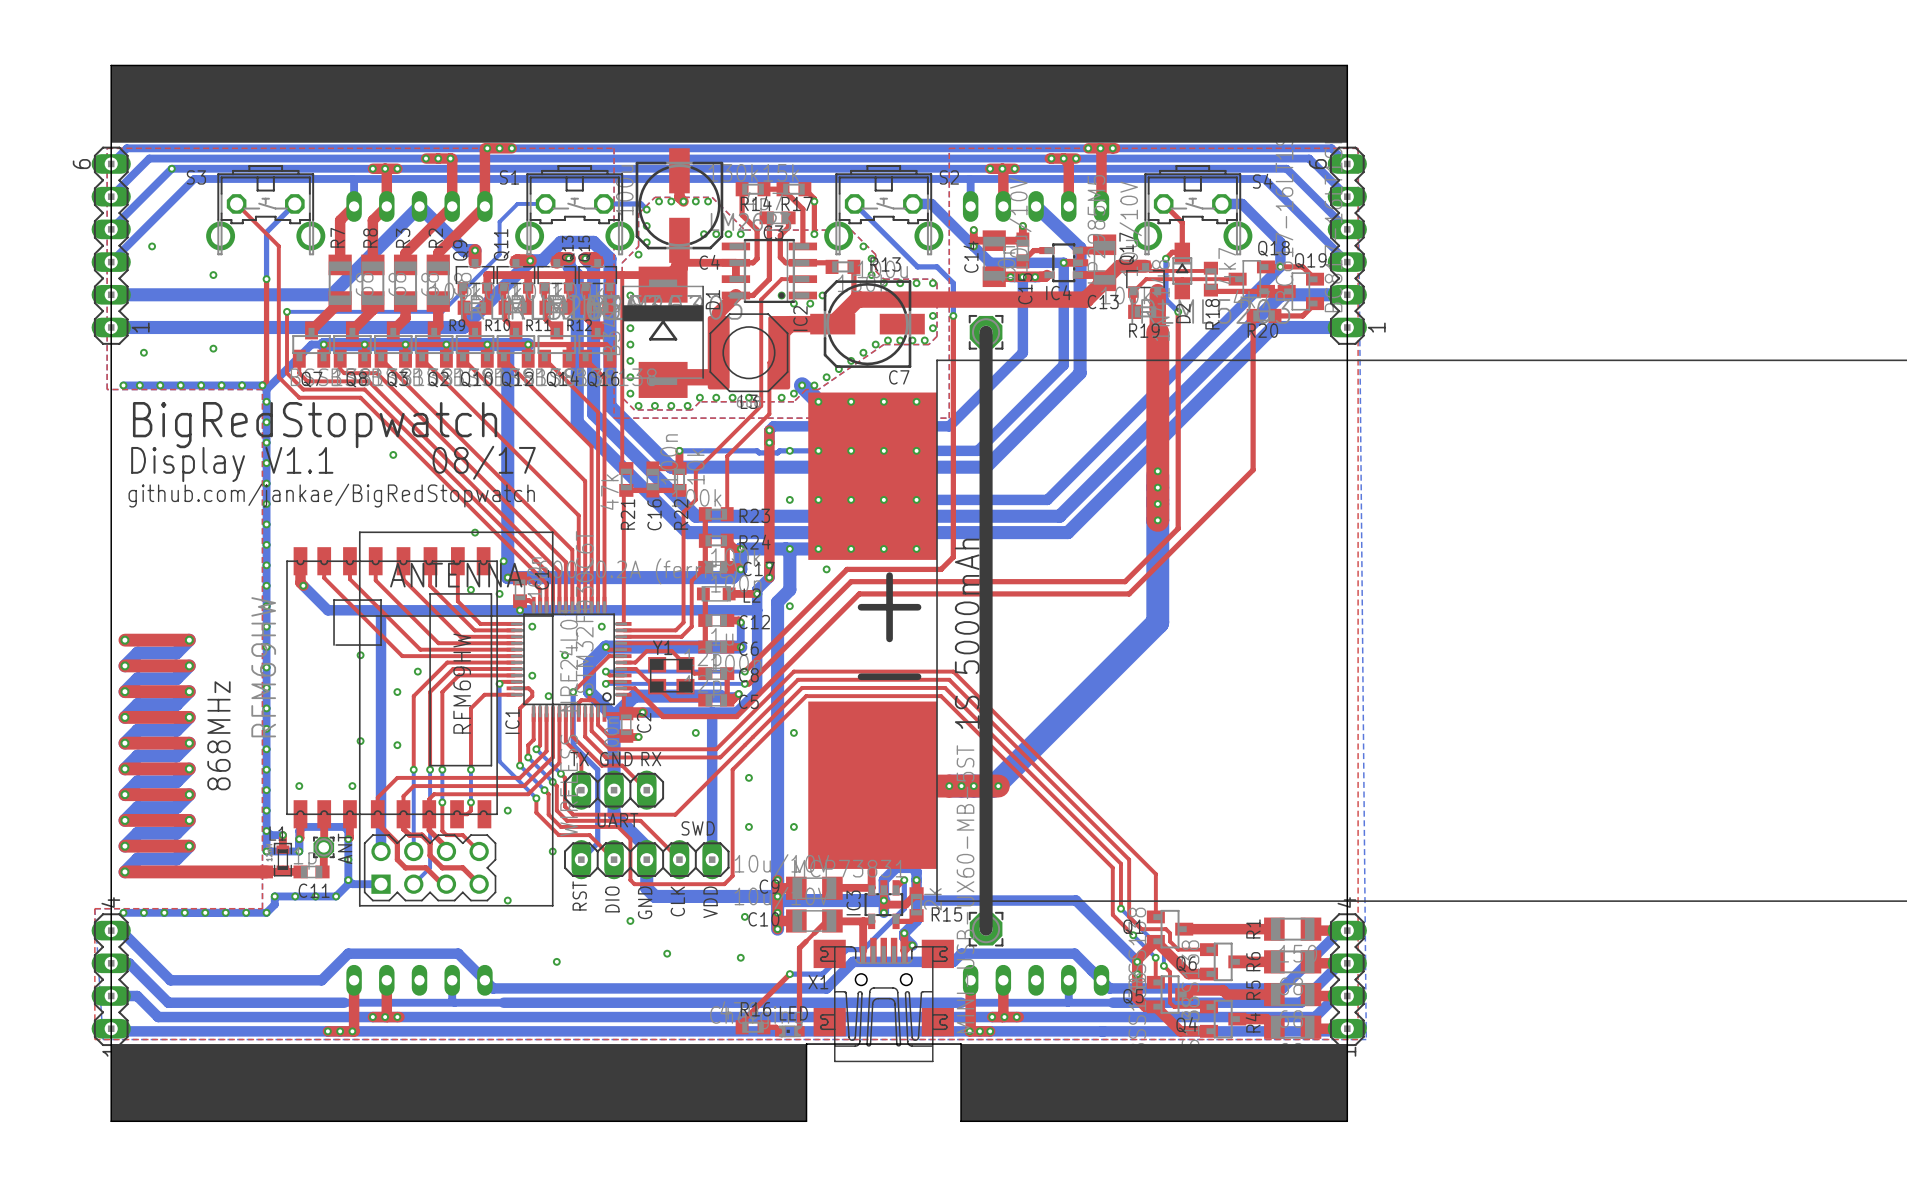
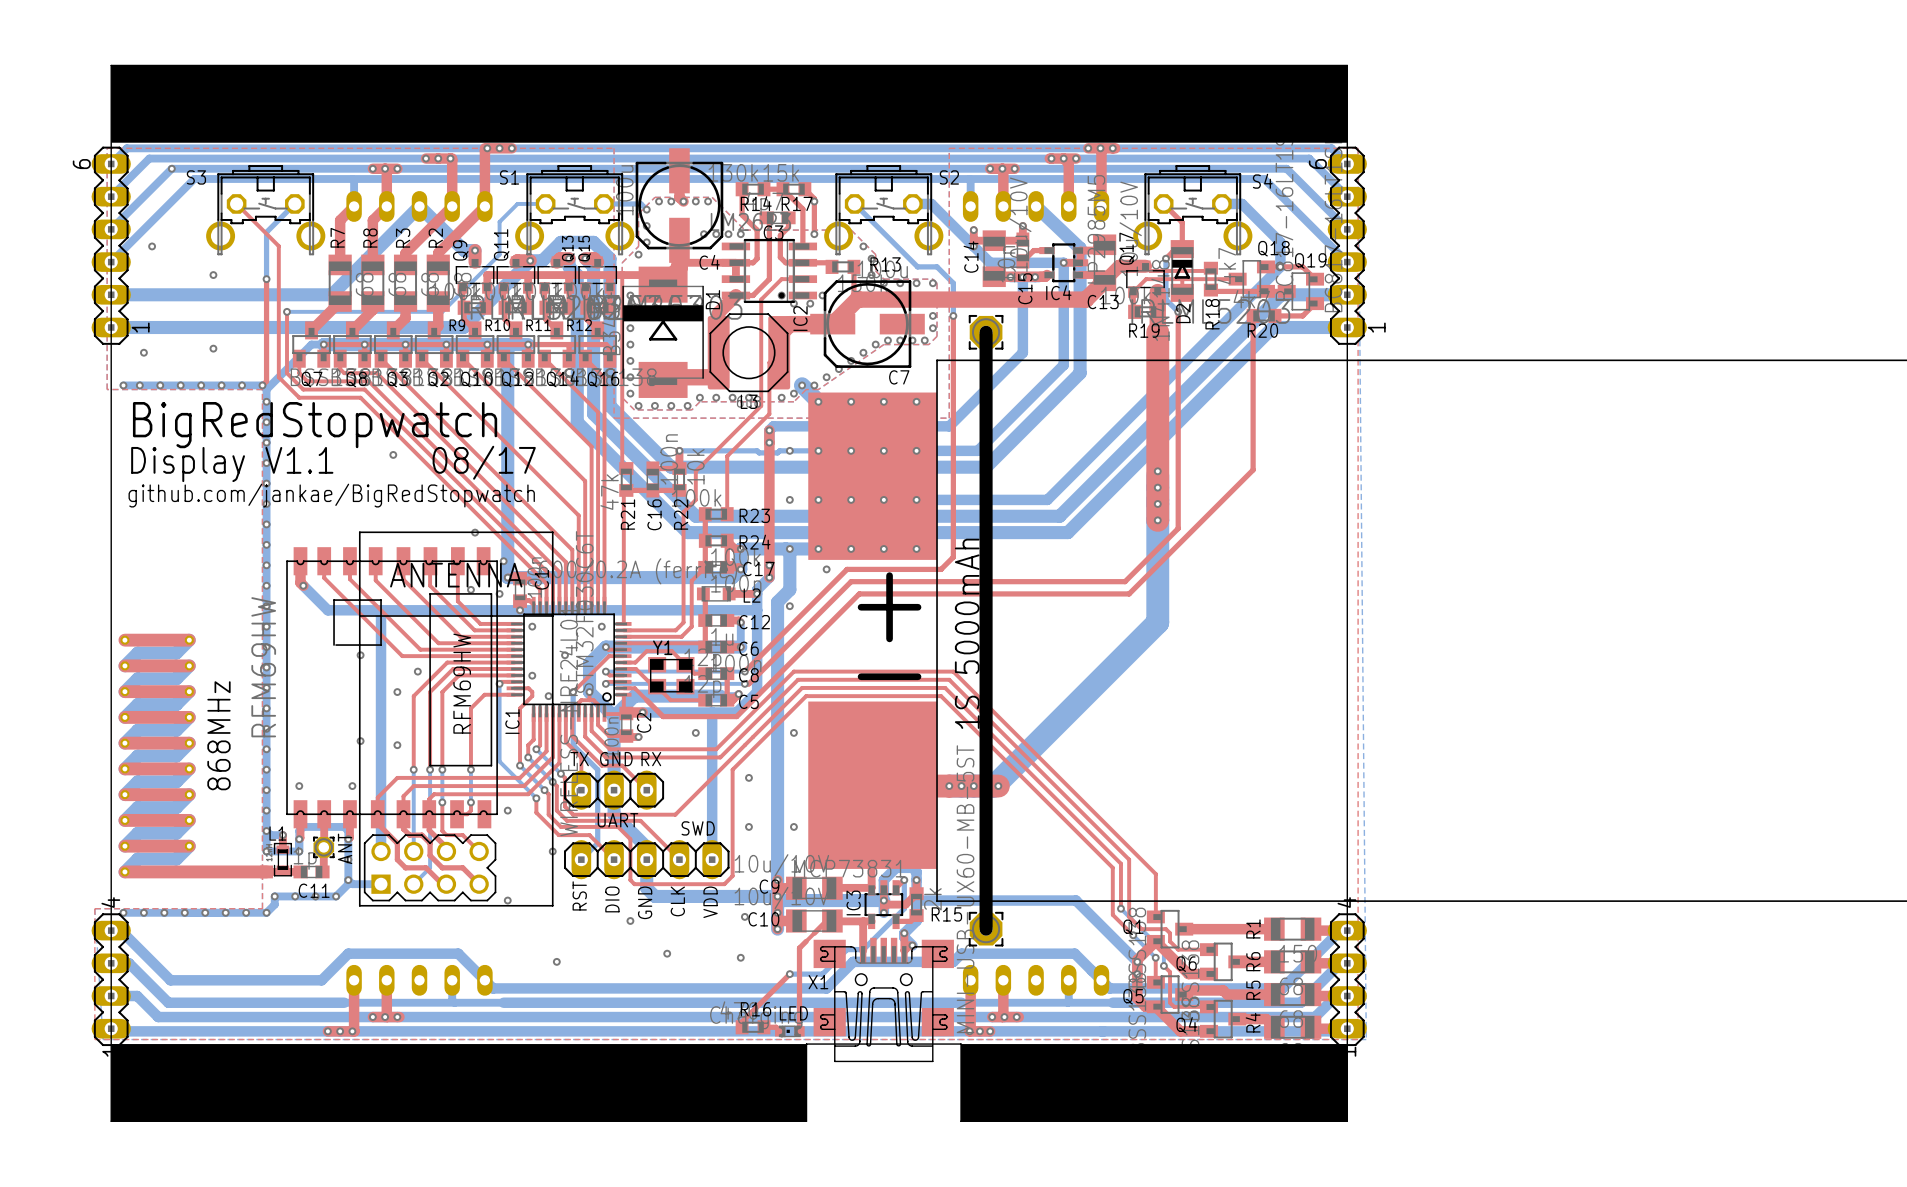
D2 footprint: [1172, 242, 1193, 300] -> [1170, 240, 1194, 302]

